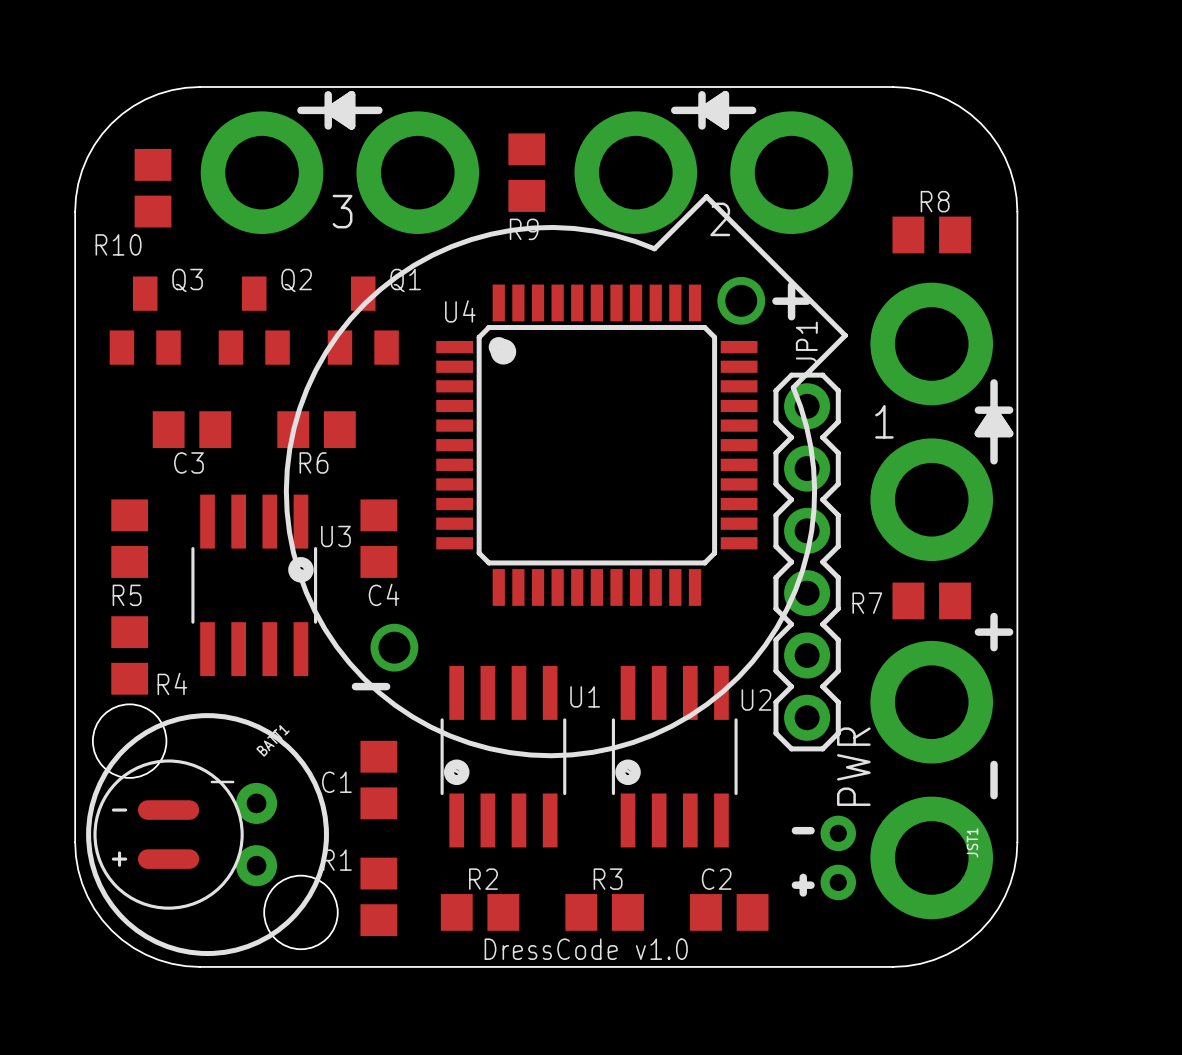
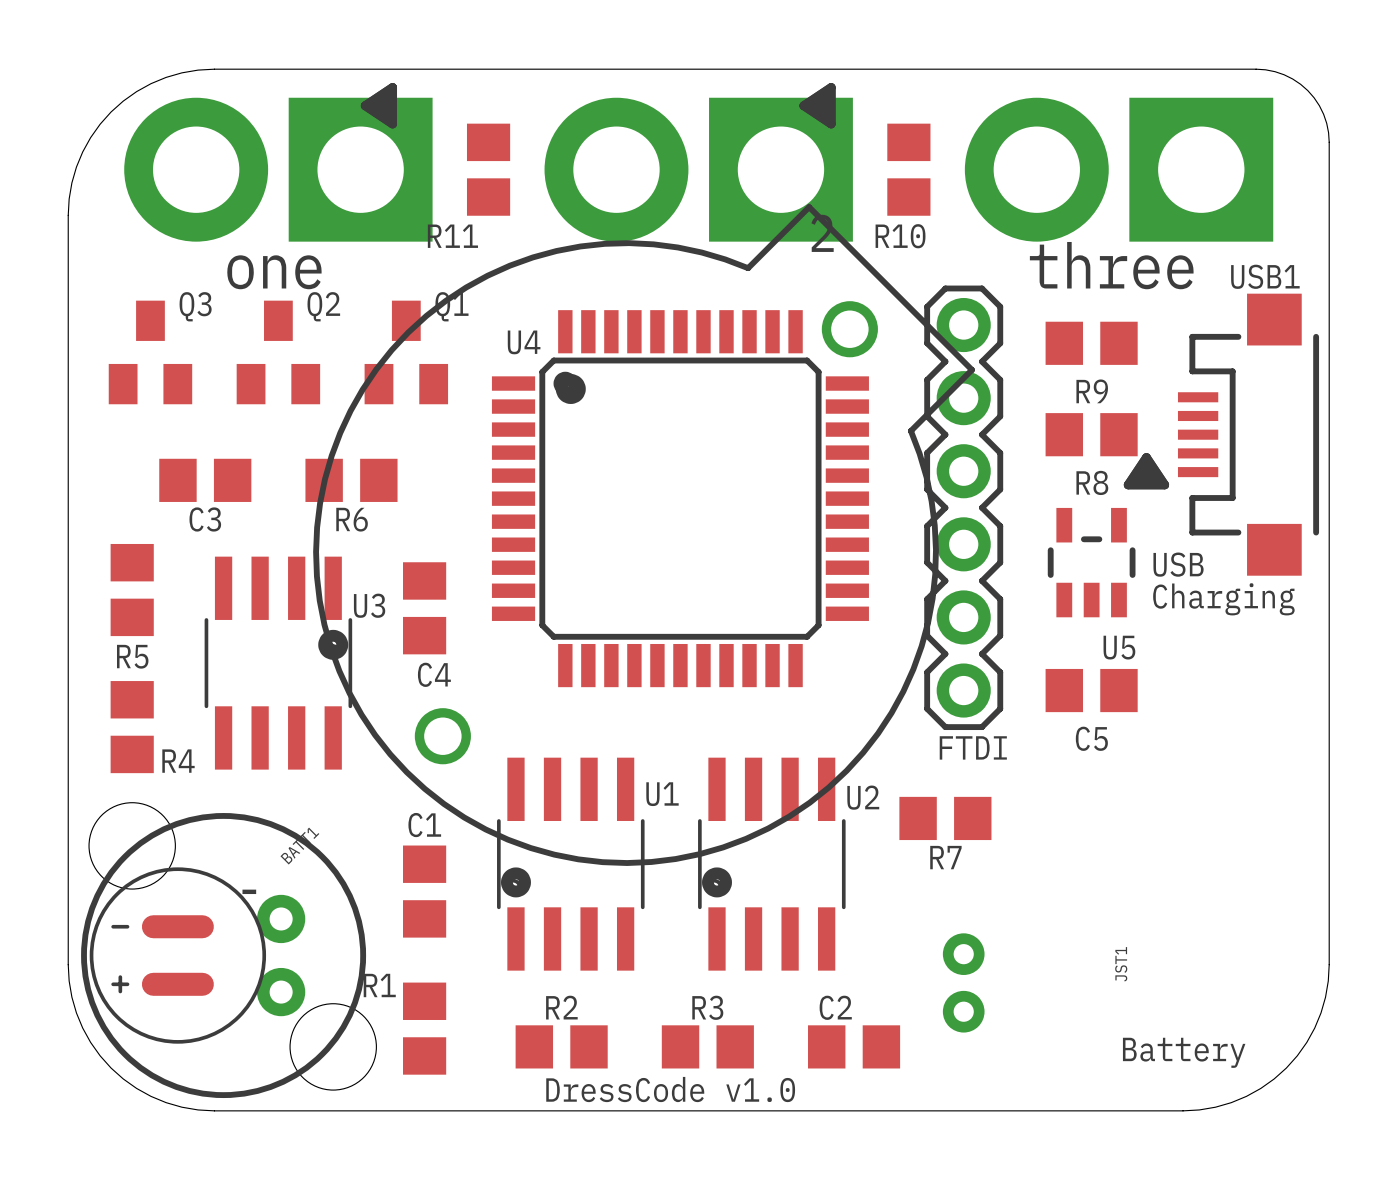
line: (328, 94) (328, 125) -> none
line: (702, 94) (702, 125) -> none
line: (300, 110) (328, 110) -> none
line: (351, 110) (378, 110) -> none
line: (674, 110) (702, 110) -> none
line: (725, 110) (752, 110) -> none
part: none -> (360, 169)
R11: none -> (488, 169)
part: none -> (616, 169)
part: none -> (780, 169)
part: none -> (1036, 169)
part: none -> (1201, 169)
part position: (262, 172) -> (196, 169)
part: (417, 172) -> none
R9 rotation: 0° (526, 172) -> 90° clockwise (1091, 343)
R9 position: (526, 172) -> (1091, 343)
part: (635, 172) -> none
part: (791, 172) -> none
R10 position: (153, 188) -> (908, 169)
R8 name position: R8 (935, 201) -> R8 (1092, 482)
board edge: (75, 211) (78, 183) (87, 157) (94, 145) (111, 123) (133, 106) (145, 99) (158, 94) (185, 87) (892, 87) (920, 90) (946, 99) (959, 106) (980, 123) (998, 145) (1005, 157) (1014, 183) (1017, 211) (1016, 856) (1010, 883) (1005, 896) (998, 908) (980, 930) (959, 947) (946, 954) (920, 963) (892, 966) -> (68, 224) (69, 199) (76, 167) (90, 137) (100, 124) (111, 112) (136, 91) (166, 77) (198, 70) (1256, 69) (1284, 74) (1307, 90) (1323, 114) (1329, 142) (1329, 964) (1325, 997) (1321, 1012) (1306, 1042) (1286, 1068) (1260, 1088) (1231, 1102) (1199, 1109) (1183, 1110) (1027, 1110)
text: 3 (342, 211) -> none
R8 position: (931, 234) -> (1091, 434)
R10 name position: R10 (118, 244) -> R10 (900, 236)
text: none -> three (1111, 265)
text: none -> one (274, 272)
line: (791, 285) (791, 316) -> none
line: (775, 301) (807, 301) -> none
part: (931, 343) -> none
line: (994, 382) (994, 410) -> none
USB1: none -> (1248, 434)
line: (978, 410) (1009, 410) -> none
text: 1 (884, 421) -> none
line: (994, 433) (994, 460) -> none
part: none -> (963, 507)
part: (931, 499) -> none
U5: none -> (1091, 562)
text: none -> USB (1178, 564)
text: none -> Charging (1223, 599)
R5 position: (129, 538) -> (132, 590)
JP1: (807, 562) -> none
R7 position: (931, 600) -> (945, 818)
R7 name position: R7 (867, 603) -> R7 (945, 857)
C5: none -> (1091, 690)
line: (994, 616) (994, 647) -> none
line: (978, 632) (1009, 632) -> none
R4 position: (129, 655) -> (132, 727)
text: none -> FTDI (973, 747)
line: (355, 686) (386, 686) -> none
part: (931, 702) -> none
line: (994, 764) (994, 795) -> none
text: PWR (853, 766) -> none
C1 name position: C1 (336, 782) -> C1 (424, 825)
line: (795, 830) (811, 830) -> none
part: (931, 857) -> none
line: (803, 877) (803, 892) -> none
line: (795, 885) (811, 885) -> none
R2 position: (480, 912) -> (561, 1046)
R3 position: (604, 912) -> (707, 1046)
C2 position: (729, 912) -> (854, 1046)
text: none -> Battery (1184, 1052)

